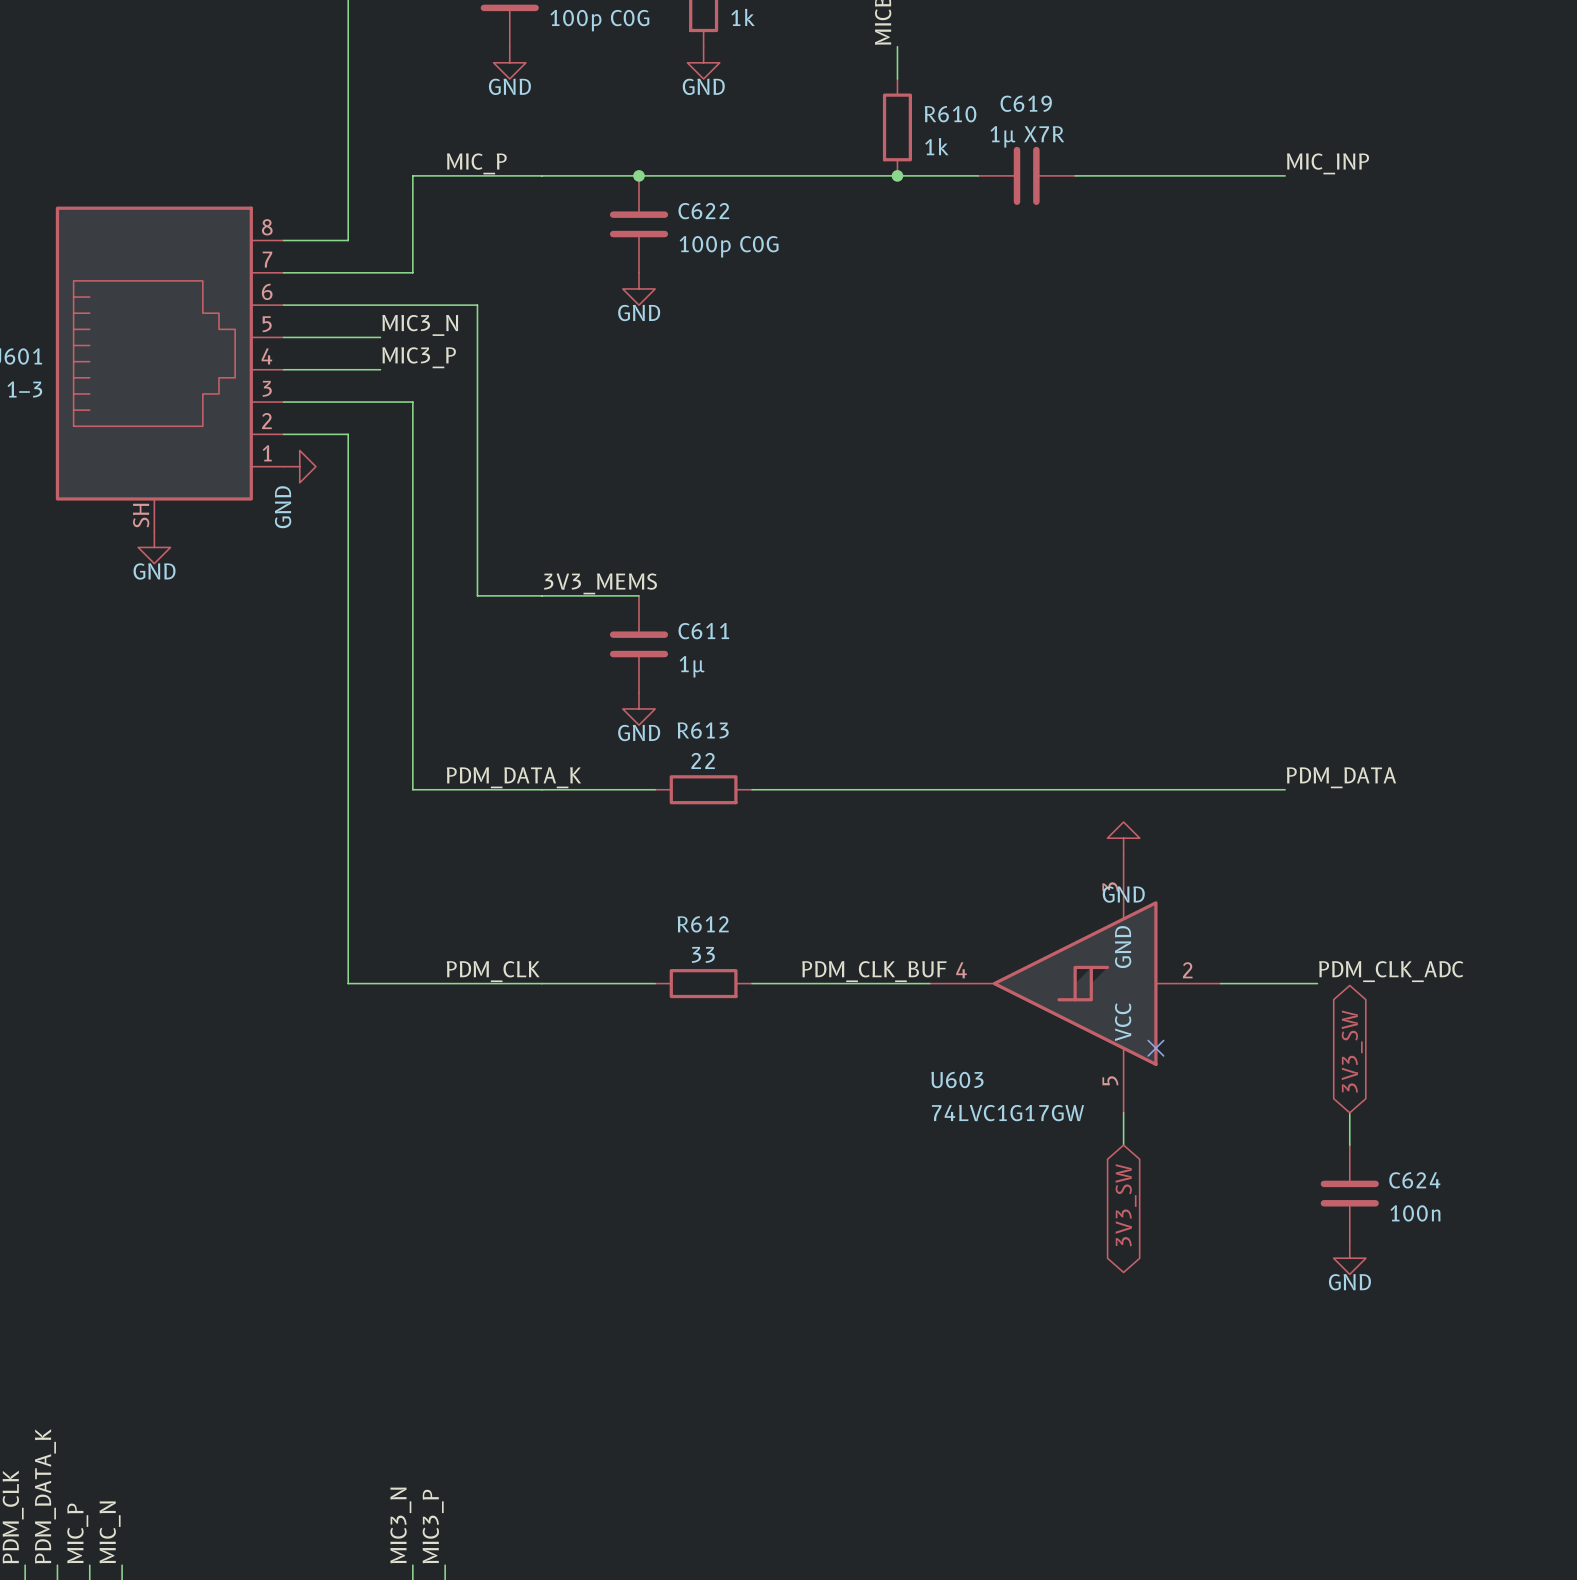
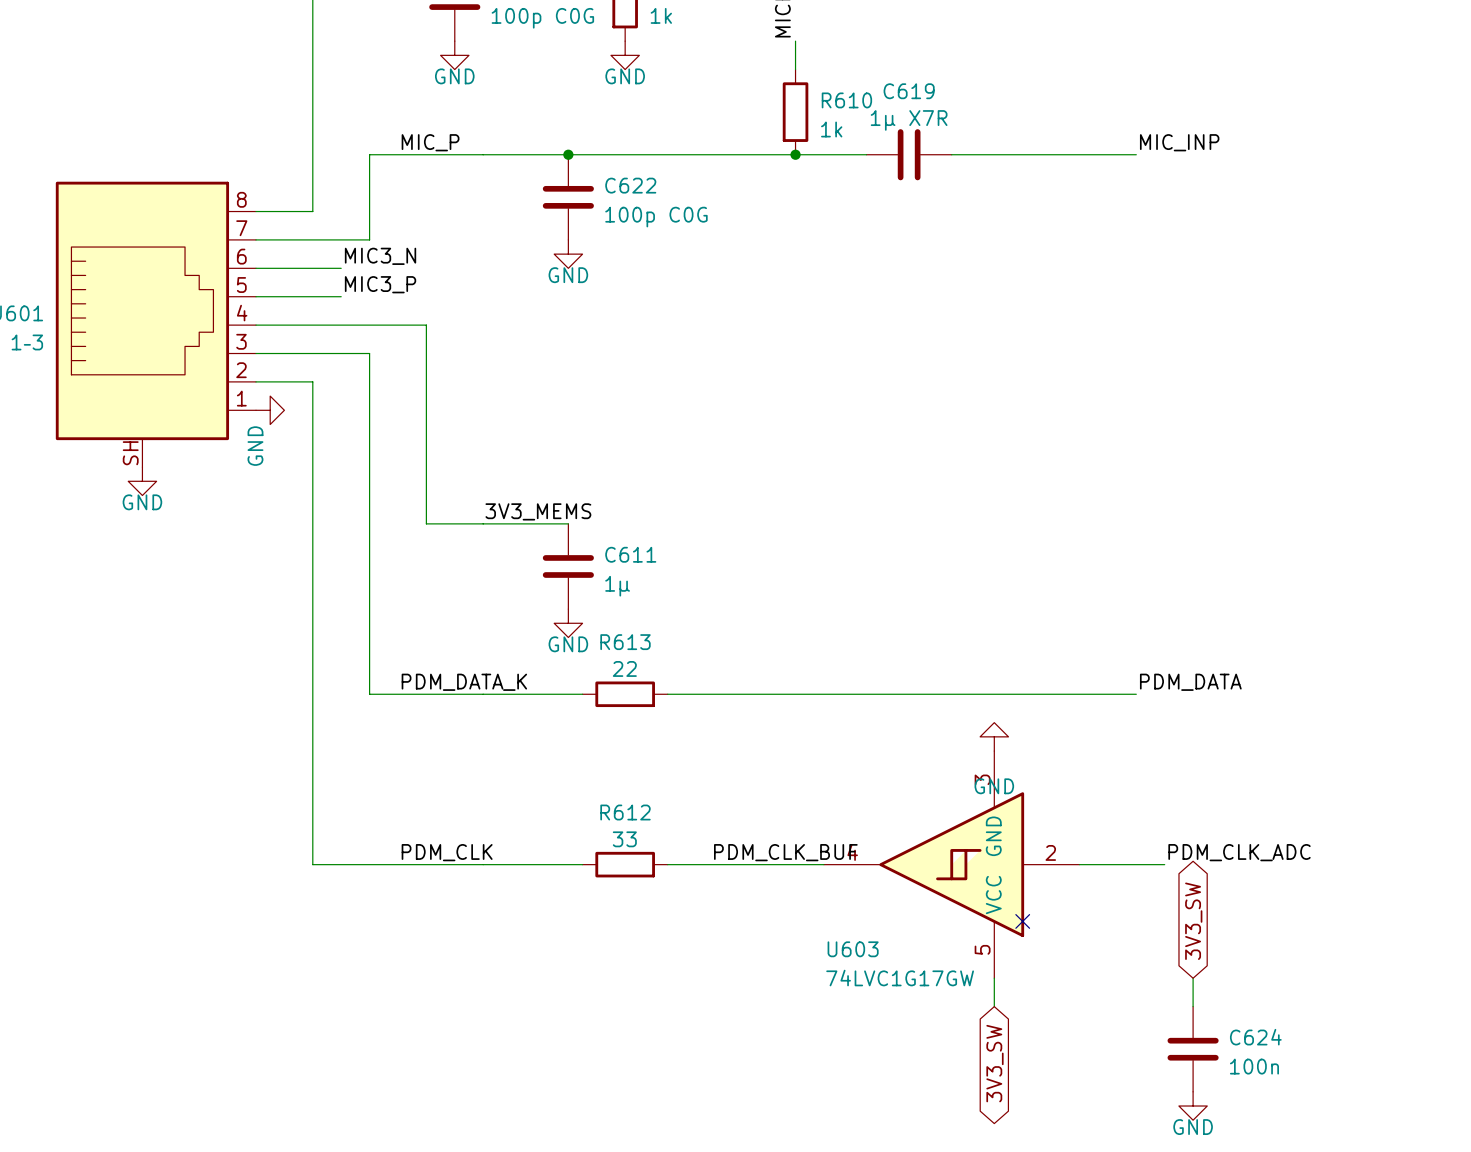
label: none -> MIC3_N (380, 256)
wire: (380, 305) (477, 305) (477, 369) -> (341, 325) (426, 325)
label: MIC3_N (420, 325) -> MIC3_P (380, 284)
label: MIC3_P (419, 357) -> none

